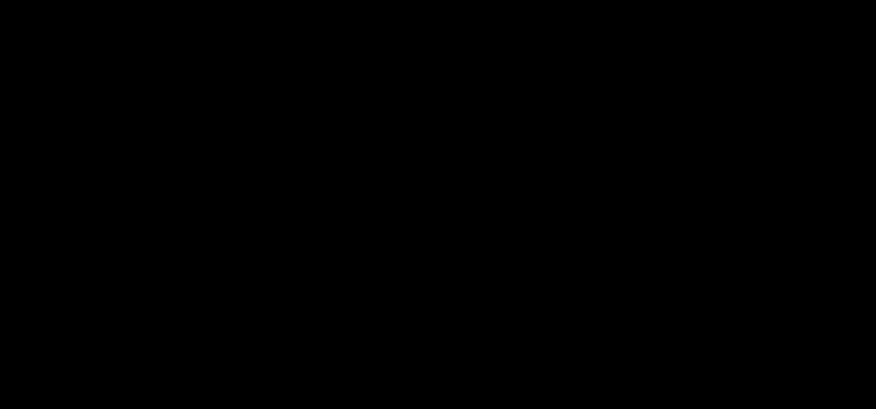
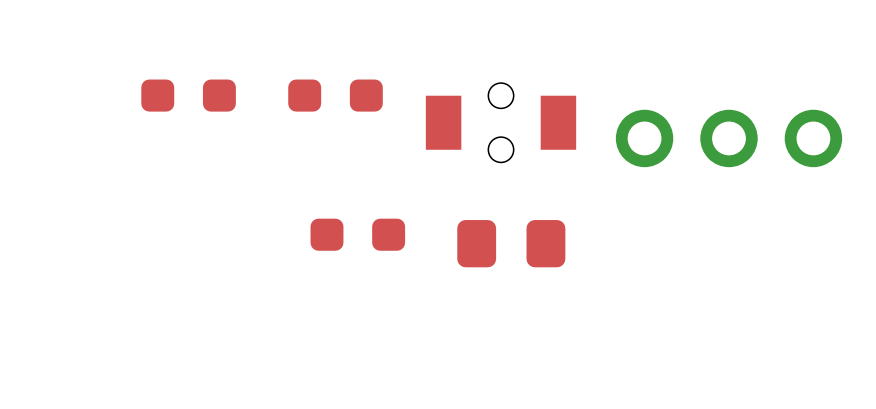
part: none -> (188, 95)
part: none -> (335, 95)
part: none -> (501, 122)
part: none -> (728, 138)
part: none -> (357, 234)
part: none -> (511, 243)

